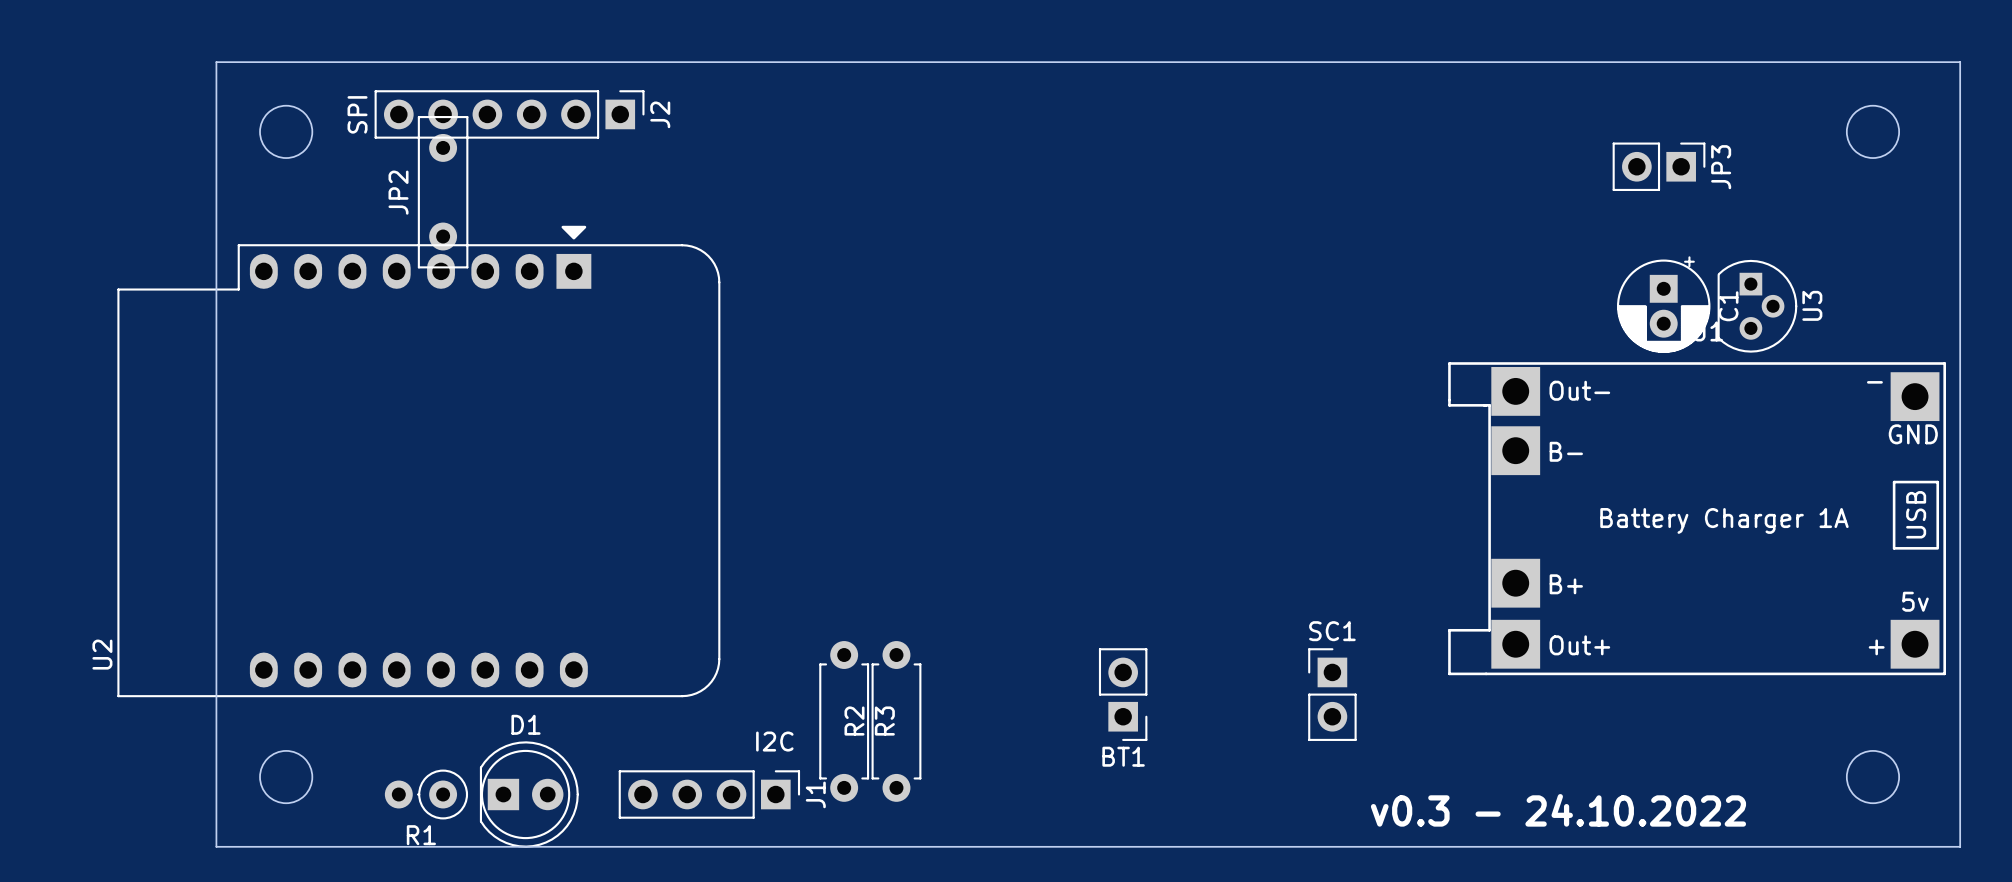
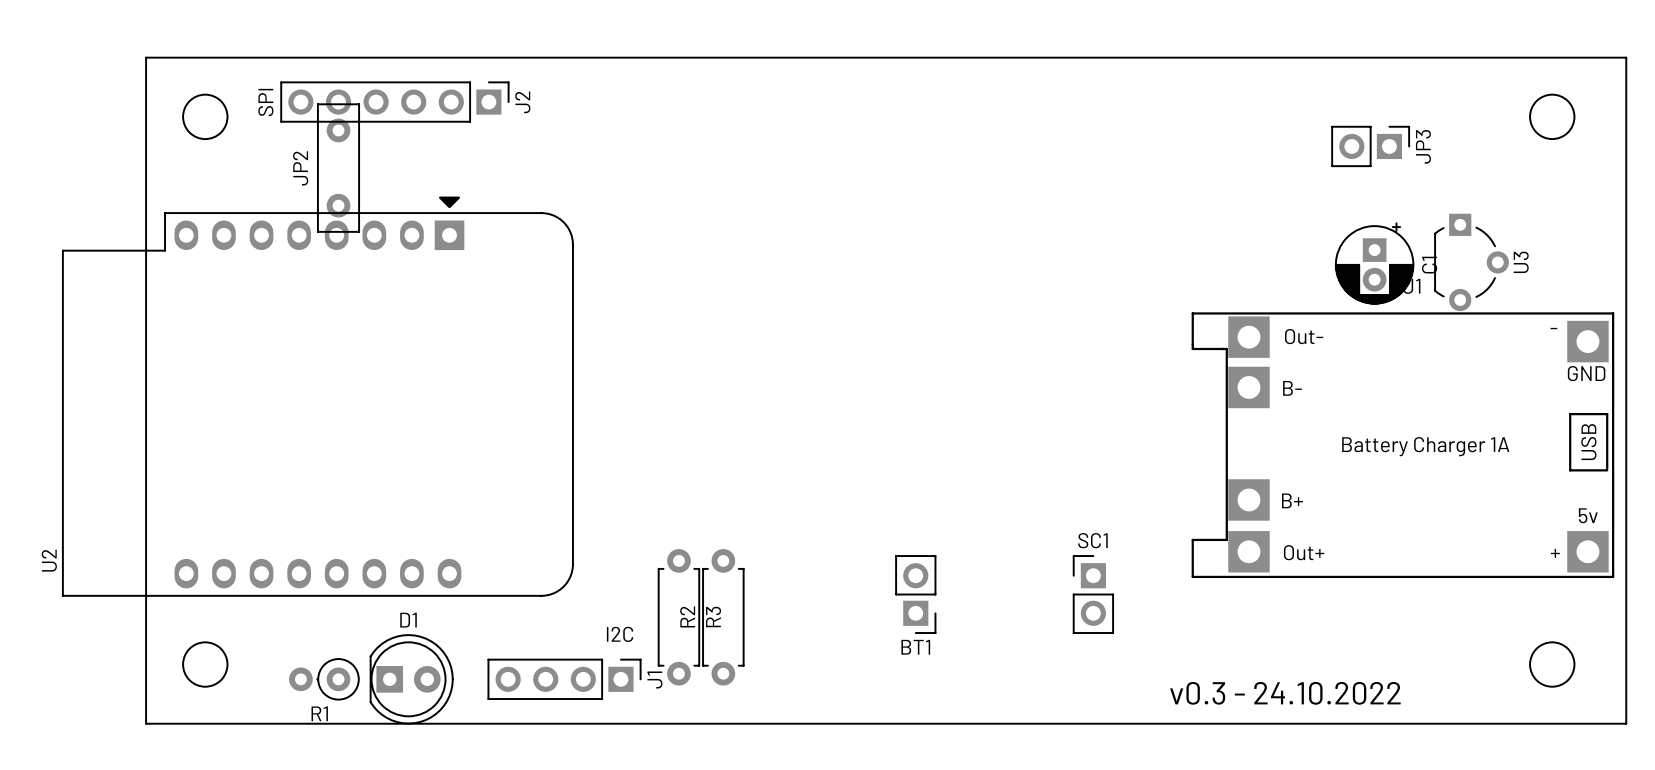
U3 footprint: [1717, 259, 1798, 353] -> [1434, 213, 1509, 312]

